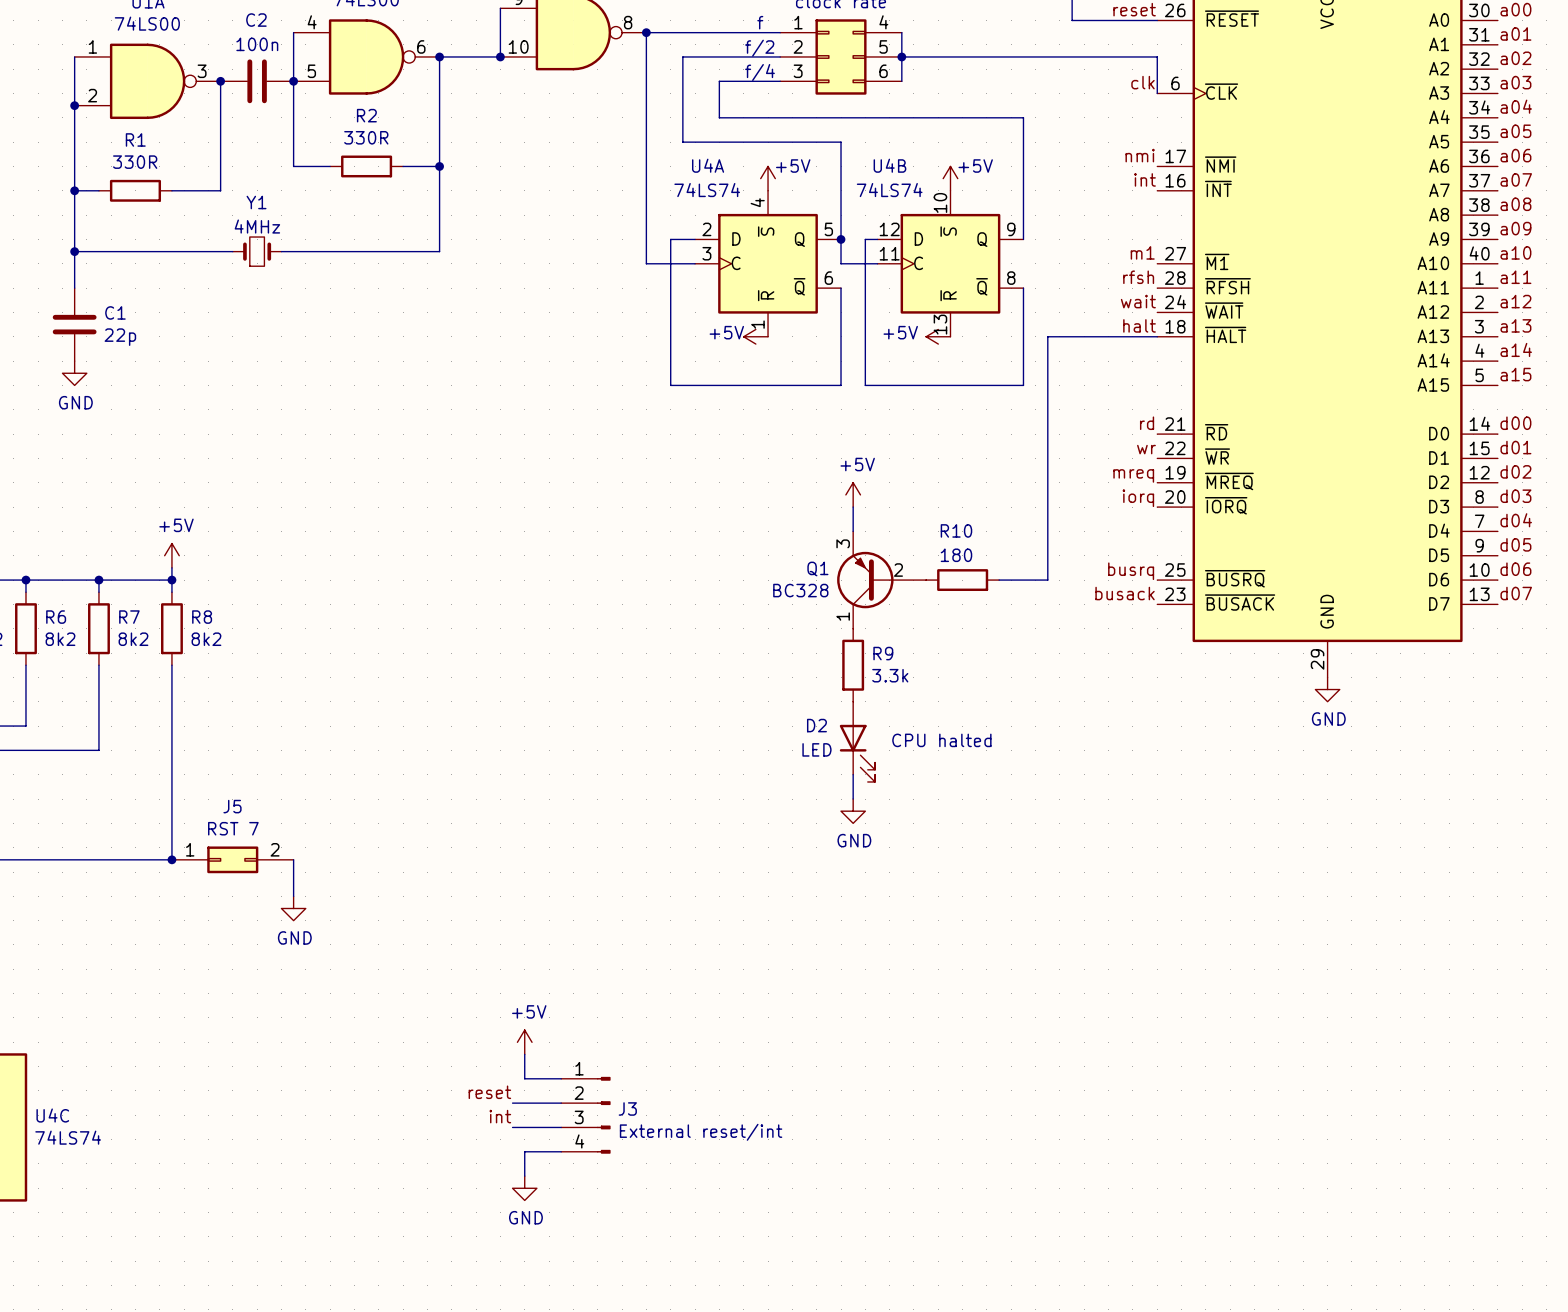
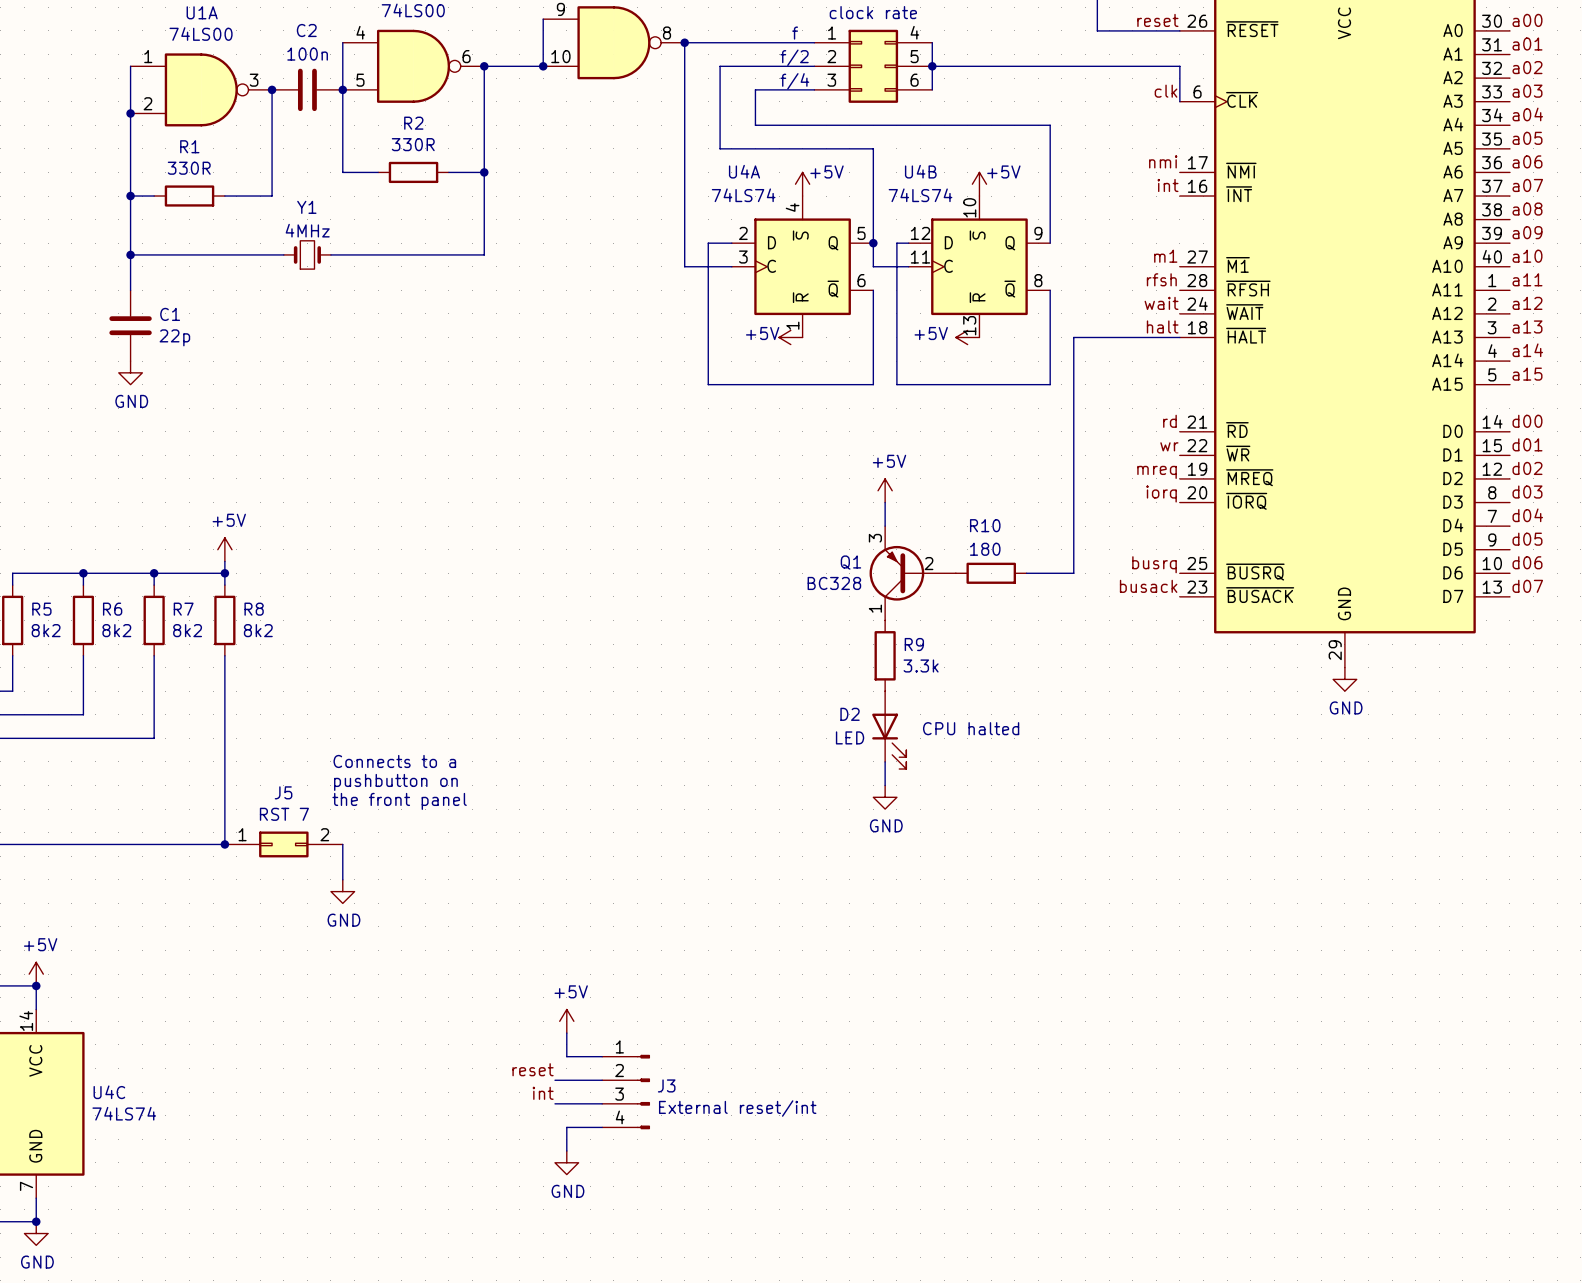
text: none -> Connects to a (394, 761)
text: none -> pushbutton on (395, 782)
text: none -> the front panel (399, 801)

